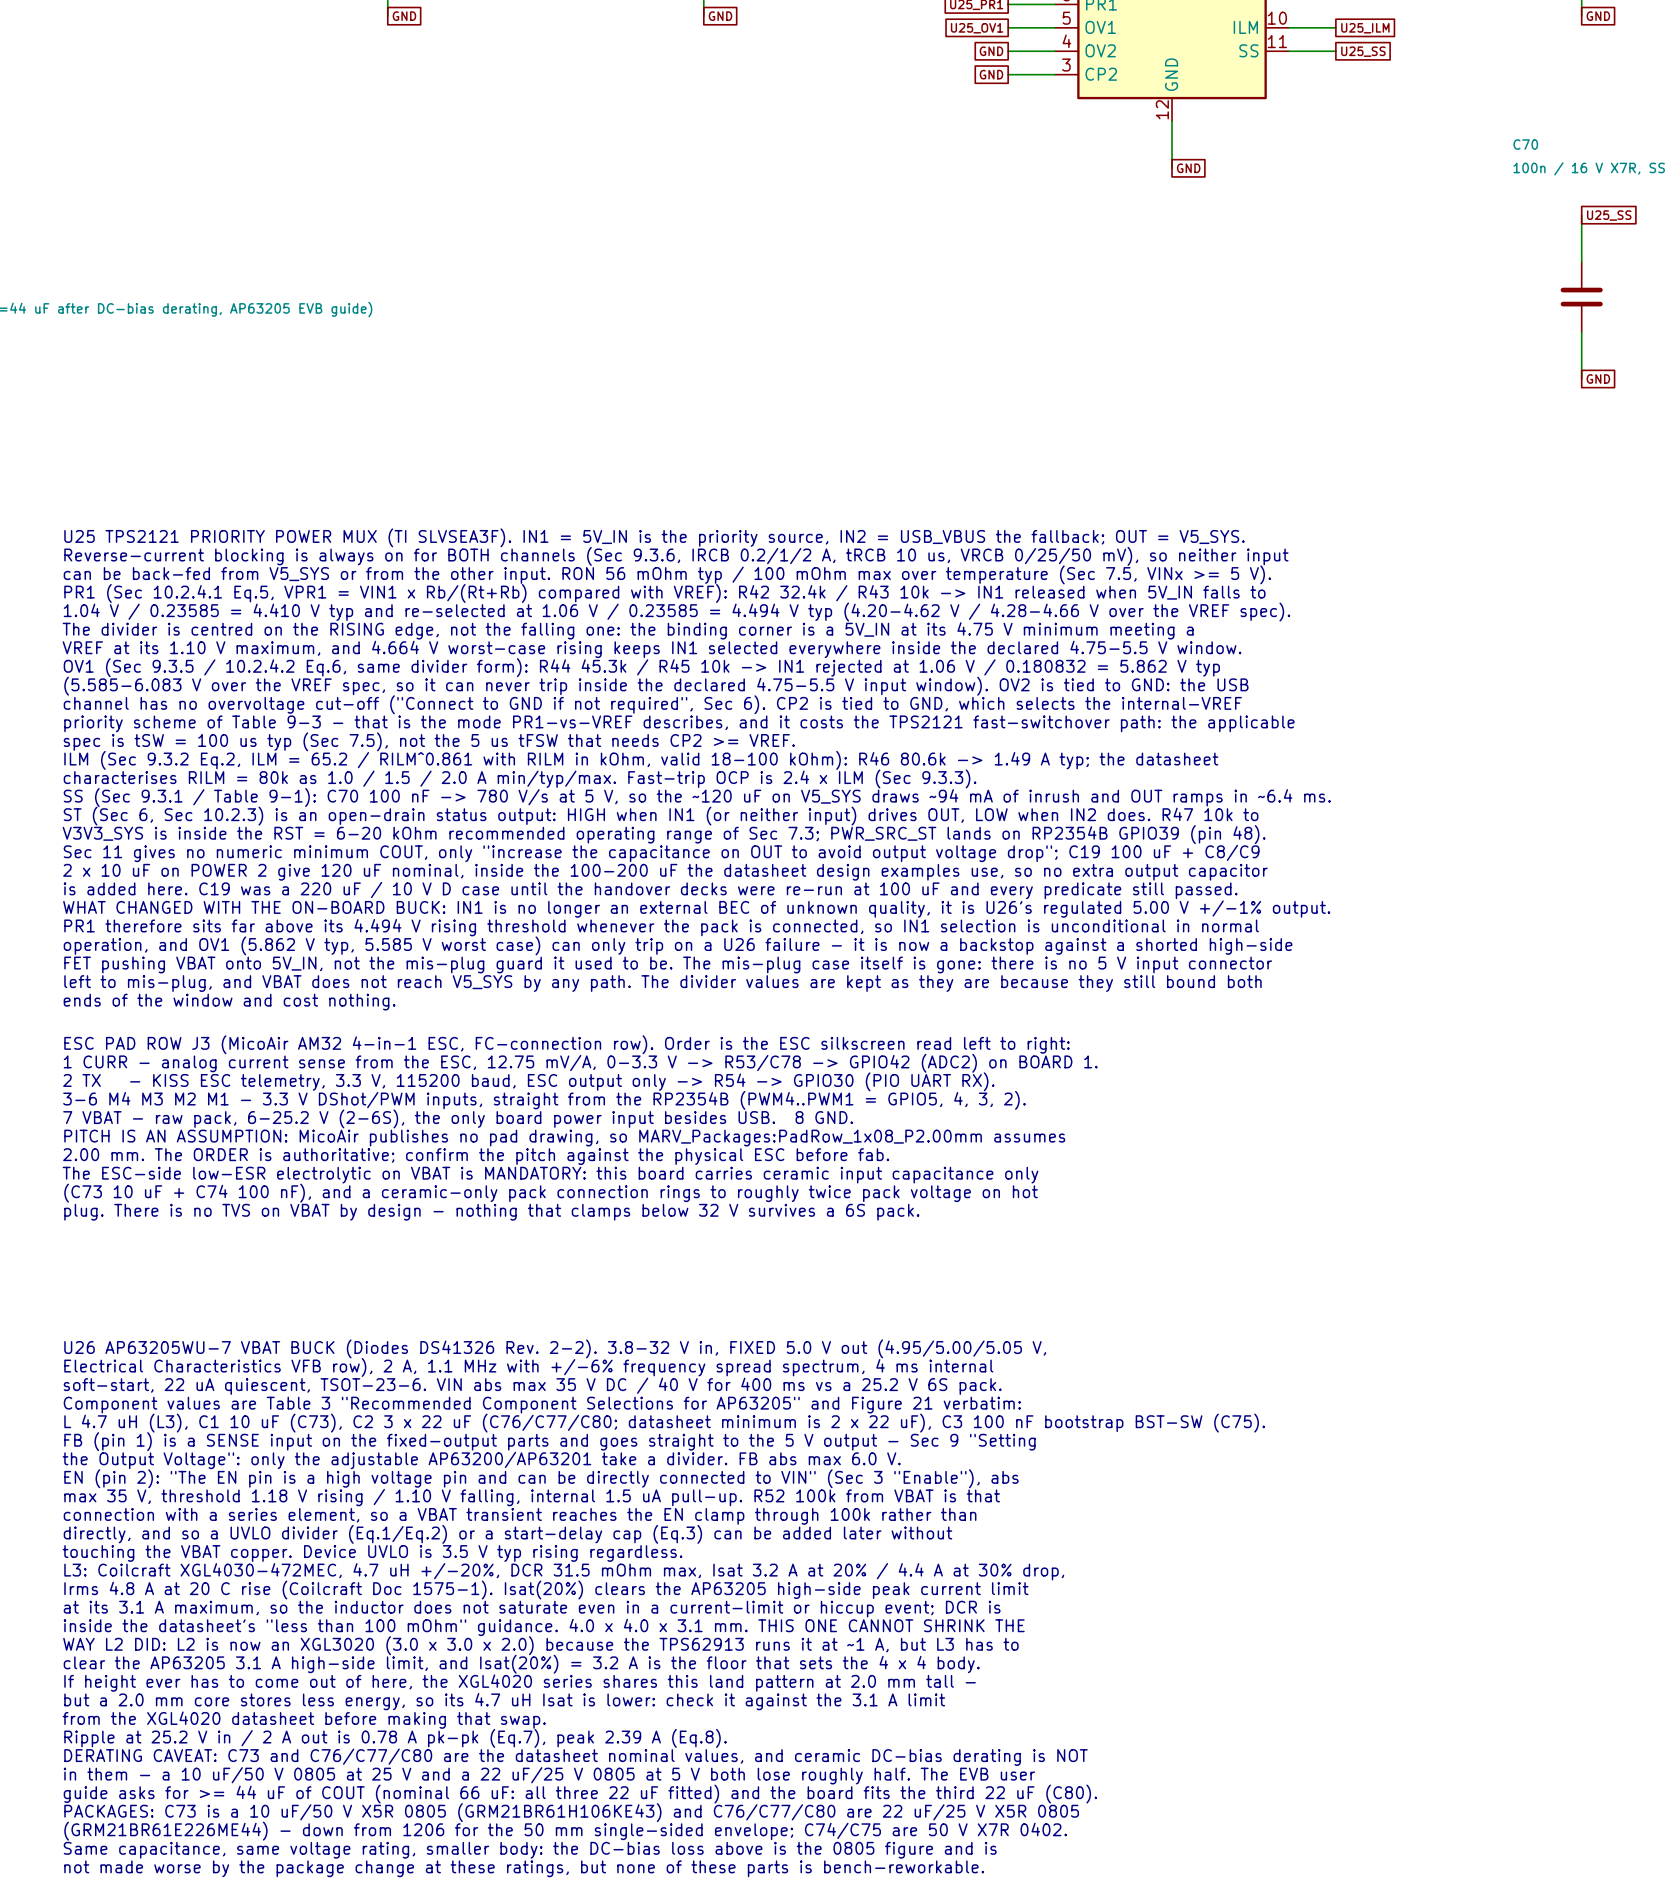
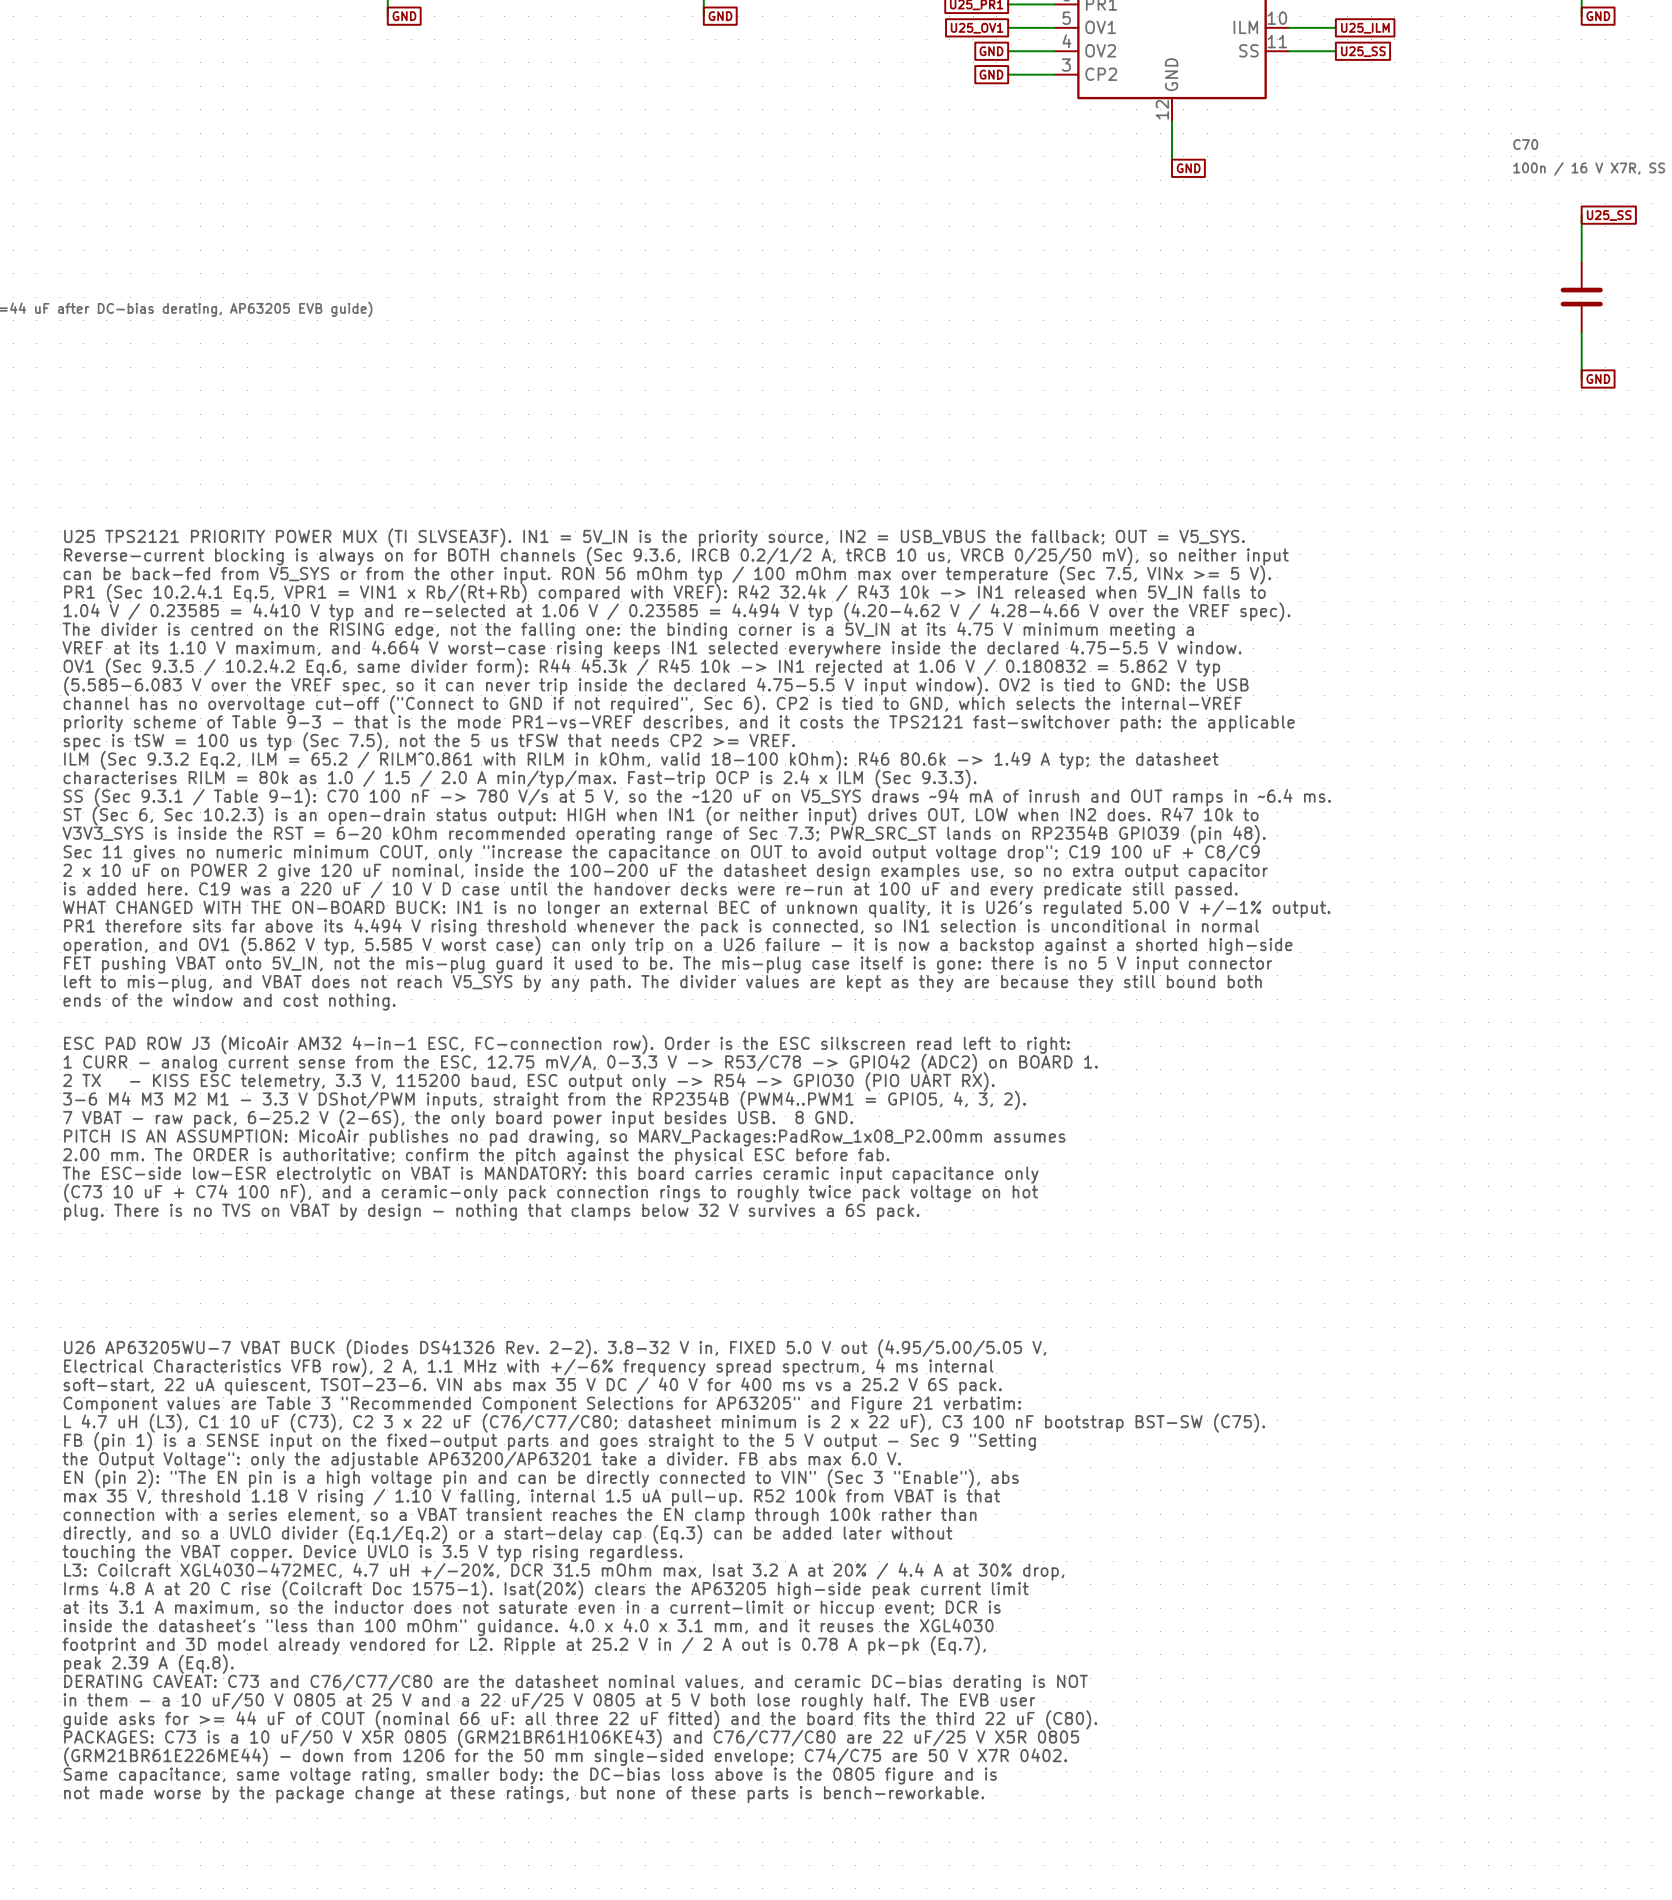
text: inside the datasheet's "less than 100 mOhm" guidance. 4.0 x 4.0 x 3.1 mm. THIS ONE CANNOT SHRINK THE (544, 1627) -> inside the datasheet's "less than 100 mOhm" guidance. 4.0 x 4.0 x 3.1 mm, and it reuses the XGL4030 (528, 1627)
text: WAY L2 DID: L2 is now an XGL3020 (3.0 x 3.0 x 2.0) because the TPS62913 runs it at ~1 A, but L3 has to (540, 1645) -> footprint and 3D model already vendored for L2. Ripple at 25.2 V in / 2 A out is 0.78 A pk-pk (Eq.7), (524, 1645)
text: clear the AP63205 3.1 A high-side limit, and Isat(20%) = 3.2 A is the floor that sets the 4 x 4 body. (521, 1664) -> peak 2.39 A (Eq.8). (148, 1664)
text: If height ever has to come out of here, the XGL4020 series shares this land pattern at 2.0 mm tall - (520, 1683) -> DERATING CAVEAT: C73 and C76/C77/C80 are the datasheet nominal values, and ceramic DC-bias derating is NOT (576, 1683)
text: but a 2.0 mm core stores less energy, so its 4.7 uH Isat is lower: check it against the 3.1 A limit (504, 1701) -> in them - a 10 uF/50 V 0805 at 25 V and a 22 uF/25 V 0805 at 5 V both lose roughly half. The EVB user (549, 1701)
text: from the XGL4020 datasheet before making that swap. (304, 1720) -> guide asks for >= 44 uF of COUT (nominal 66 uF: all three 22 uF fitted) and the board fits the third 22 uF (C80). (580, 1719)
text: Ripple at 25.2 V in / 2 A out is 0.78 A pk-pk (Eq.7), peak 2.39 A (Eq.8). (395, 1738) -> PACKAGES: C73 is a 10 uF/50 V X5R 0805 (GRM21BR61H106KE43) and C76/C77/C80 are 22 uF/25 V X5R 0805 (571, 1738)
text: DERATING CAVEAT: C73 and C76/C77/C80 are the datasheet nominal values, and ceramic DC-bias derating is NOT (576, 1757) -> (GRM21BR61E226ME44) - down from 1206 for the 50 mm single-sided envelope; C74/C75 are 50 V X7R 0402. (565, 1756)
text: in them - a 10 uF/50 V 0805 at 25 V and a 22 uF/25 V 0805 at 5 V both lose roughly half. The EVB user (549, 1775) -> Same capacitance, same voltage rating, smaller body: the DC-bias loss above is the 0805 figure and is (530, 1776)
text: guide asks for >= 44 uF of COUT (nominal 66 uF: all three 22 uF fitted) and the board fits the third 22 uF (C80). (580, 1794) -> not made worse by the package change at these ratings, but none of these parts is bench-reworkable. (524, 1794)
text: PACKAGES: C73 is a 10 uF/50 V X5R 0805 (GRM21BR61H106KE43) and C76/C77/C80 are 22 uF/25 V X5R 0805 (571, 1812) -> none
text: (GRM21BR61E226ME44) - down from 1206 for the 50 mm single-sided envelope; C74/C75 are 50 V X7R 0402. (565, 1831) -> none
text: Same capacitance, same voltage rating, smaller body: the DC-bias loss above is the 0805 figure and is (530, 1850) -> none
text: not made worse by the package change at these ratings, but none of these parts is bench-reworkable. (524, 1868) -> none

